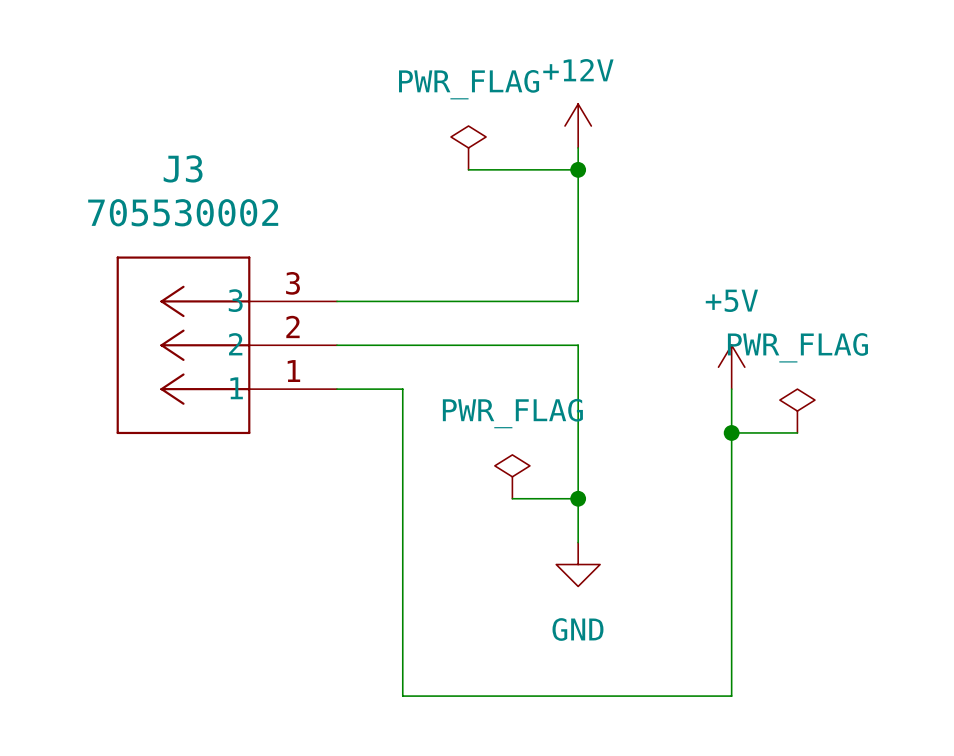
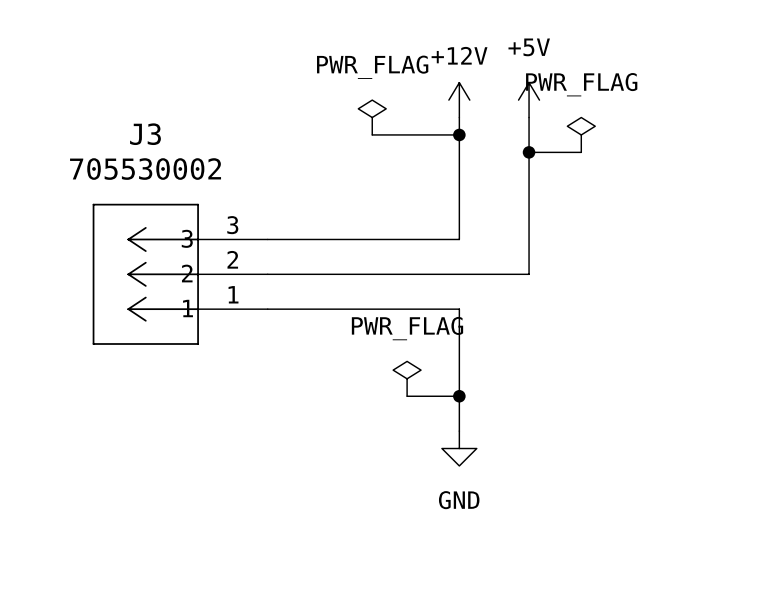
junction: none -> (529, 152)
wire: (578, 345) (578, 389) -> (459, 274) (529, 274) (529, 117)
power symbol position: +5V (731, 367) -> +5V (529, 100)
wire: (402, 389) (402, 696) (731, 696) (731, 389) -> (319, 309) (459, 309)
power symbol position: PWR_FLAG (797, 411) -> PWR_FLAG (581, 134)
wire: (731, 432) (797, 432) -> (529, 152) (581, 152)
junction: (731, 432) -> none

